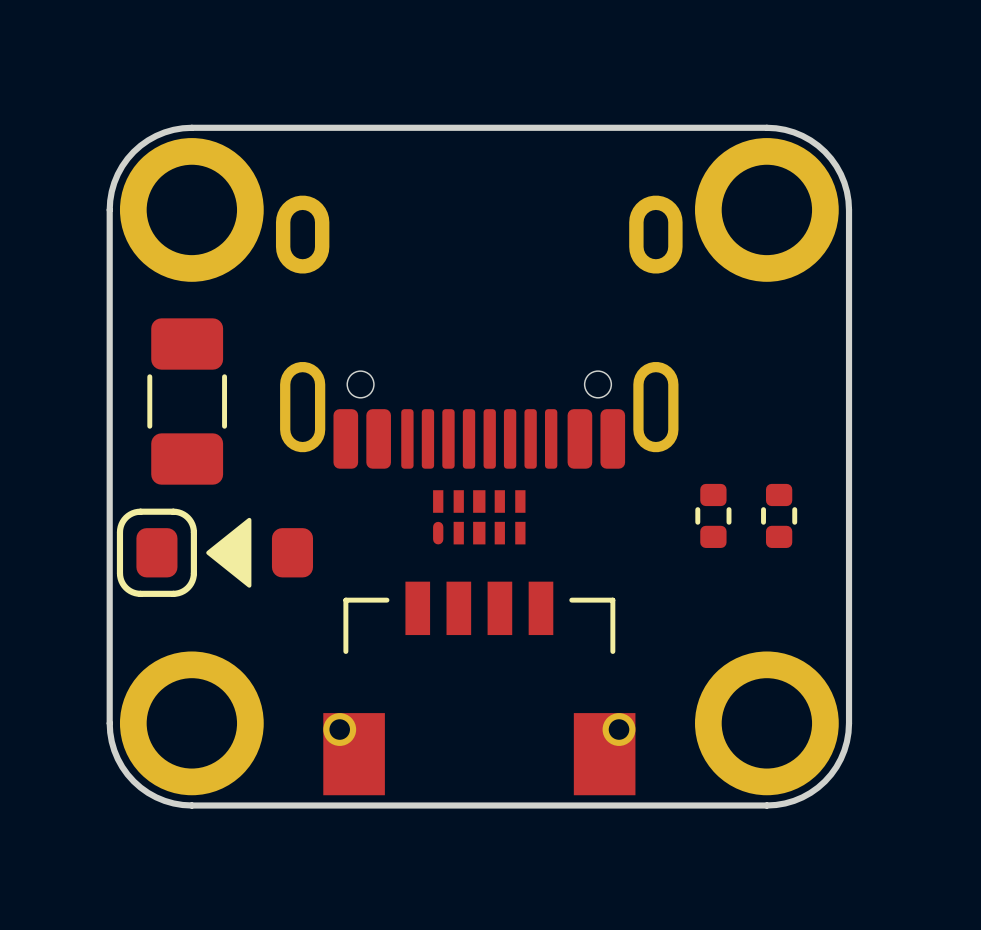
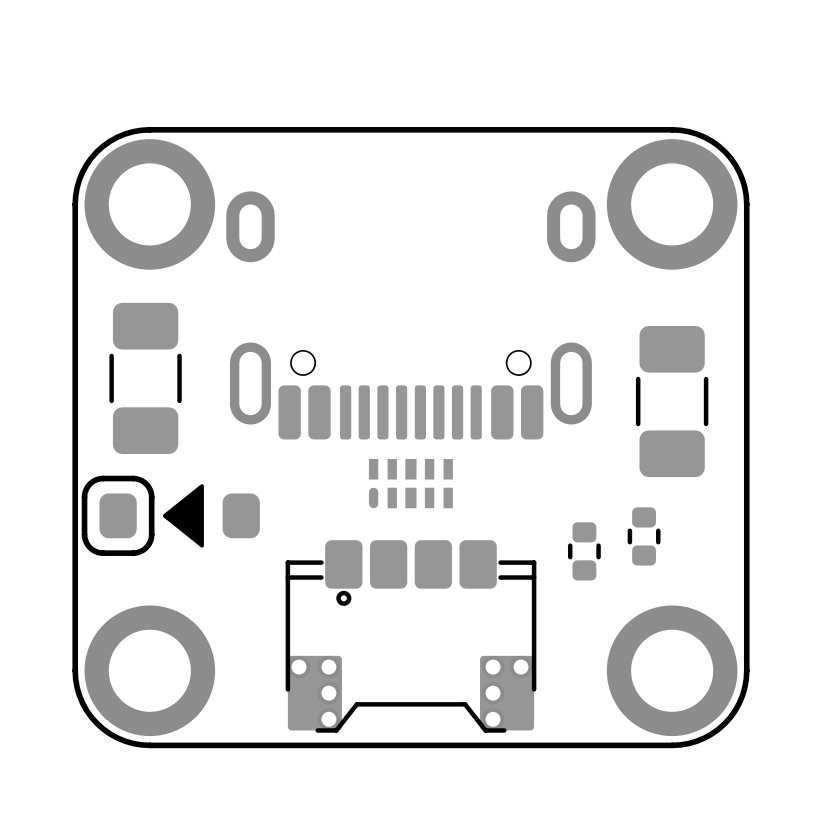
part: none -> (672, 401)
part: (713, 515) -> none
part: (779, 515) -> none
part: none -> (644, 536)
part footprint: [323, 581, 636, 808] -> [285, 540, 537, 733]
part: none -> (584, 551)

